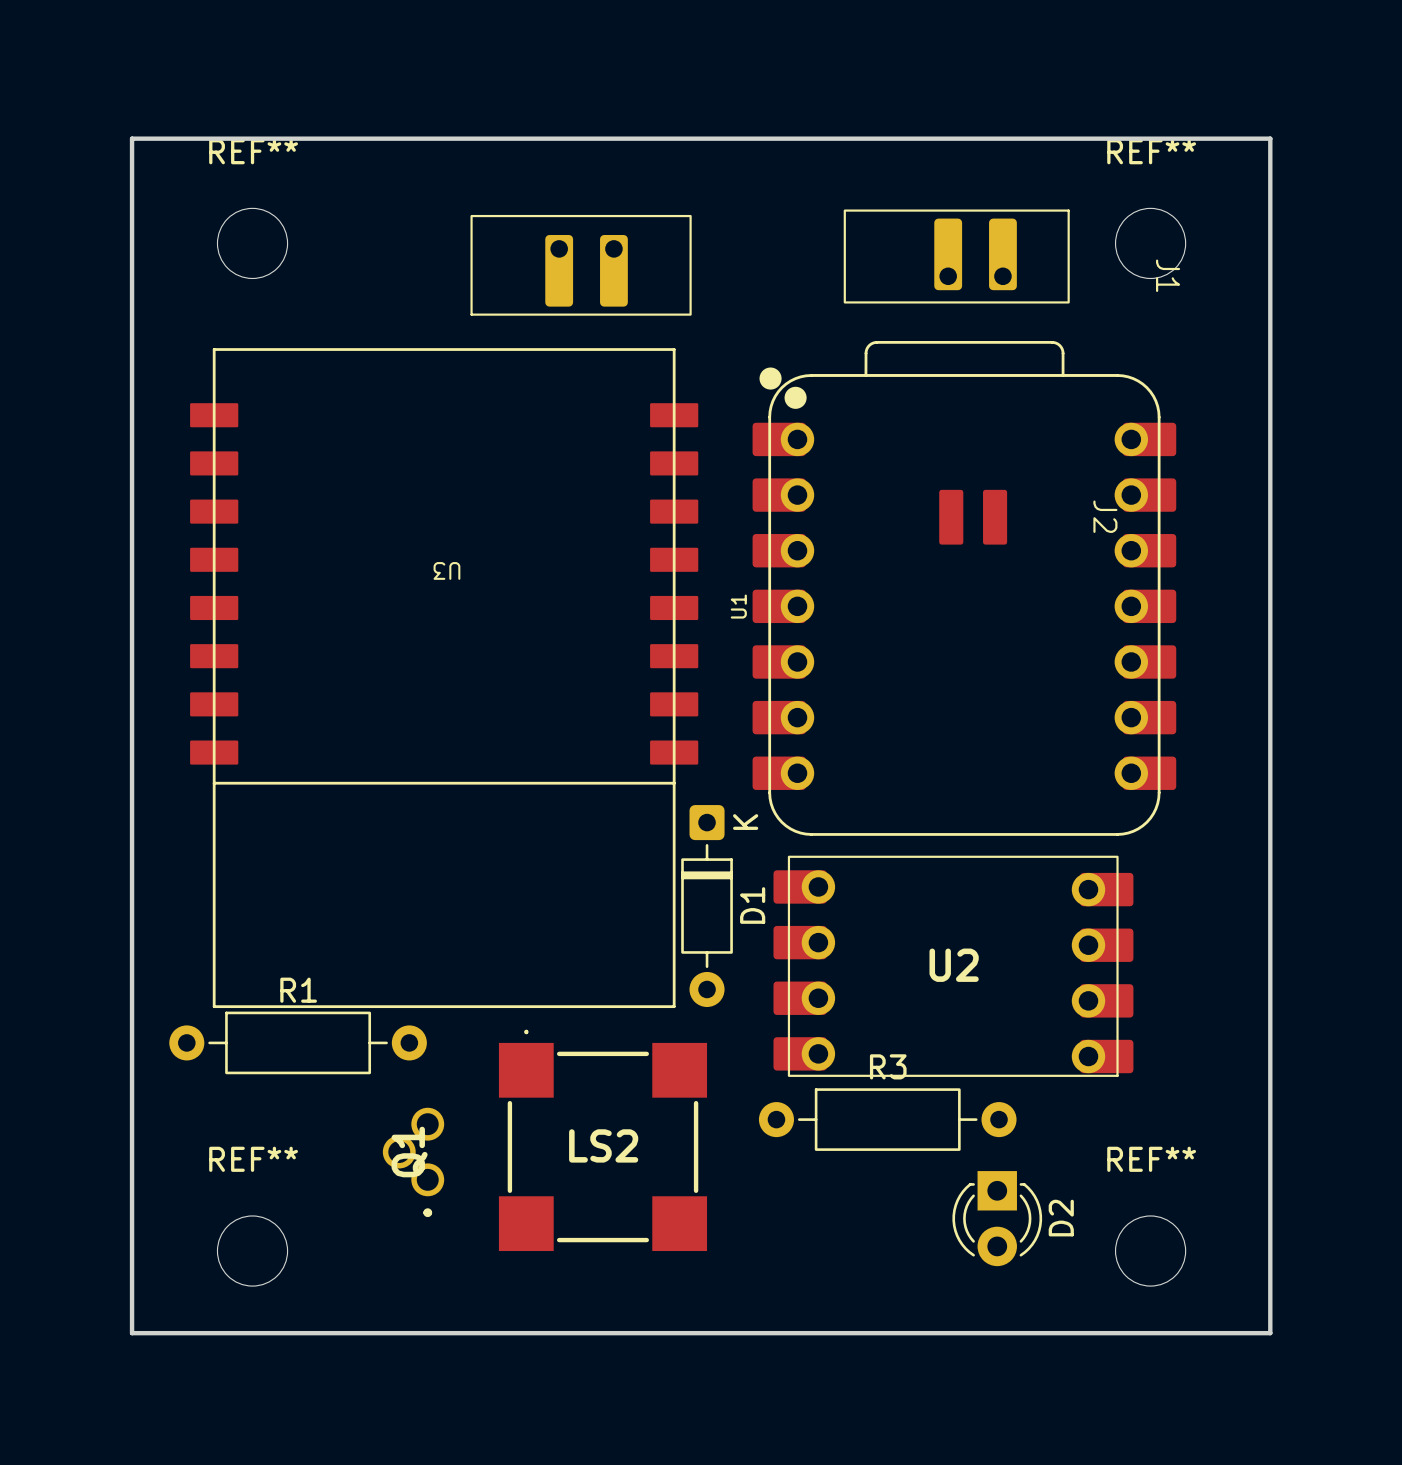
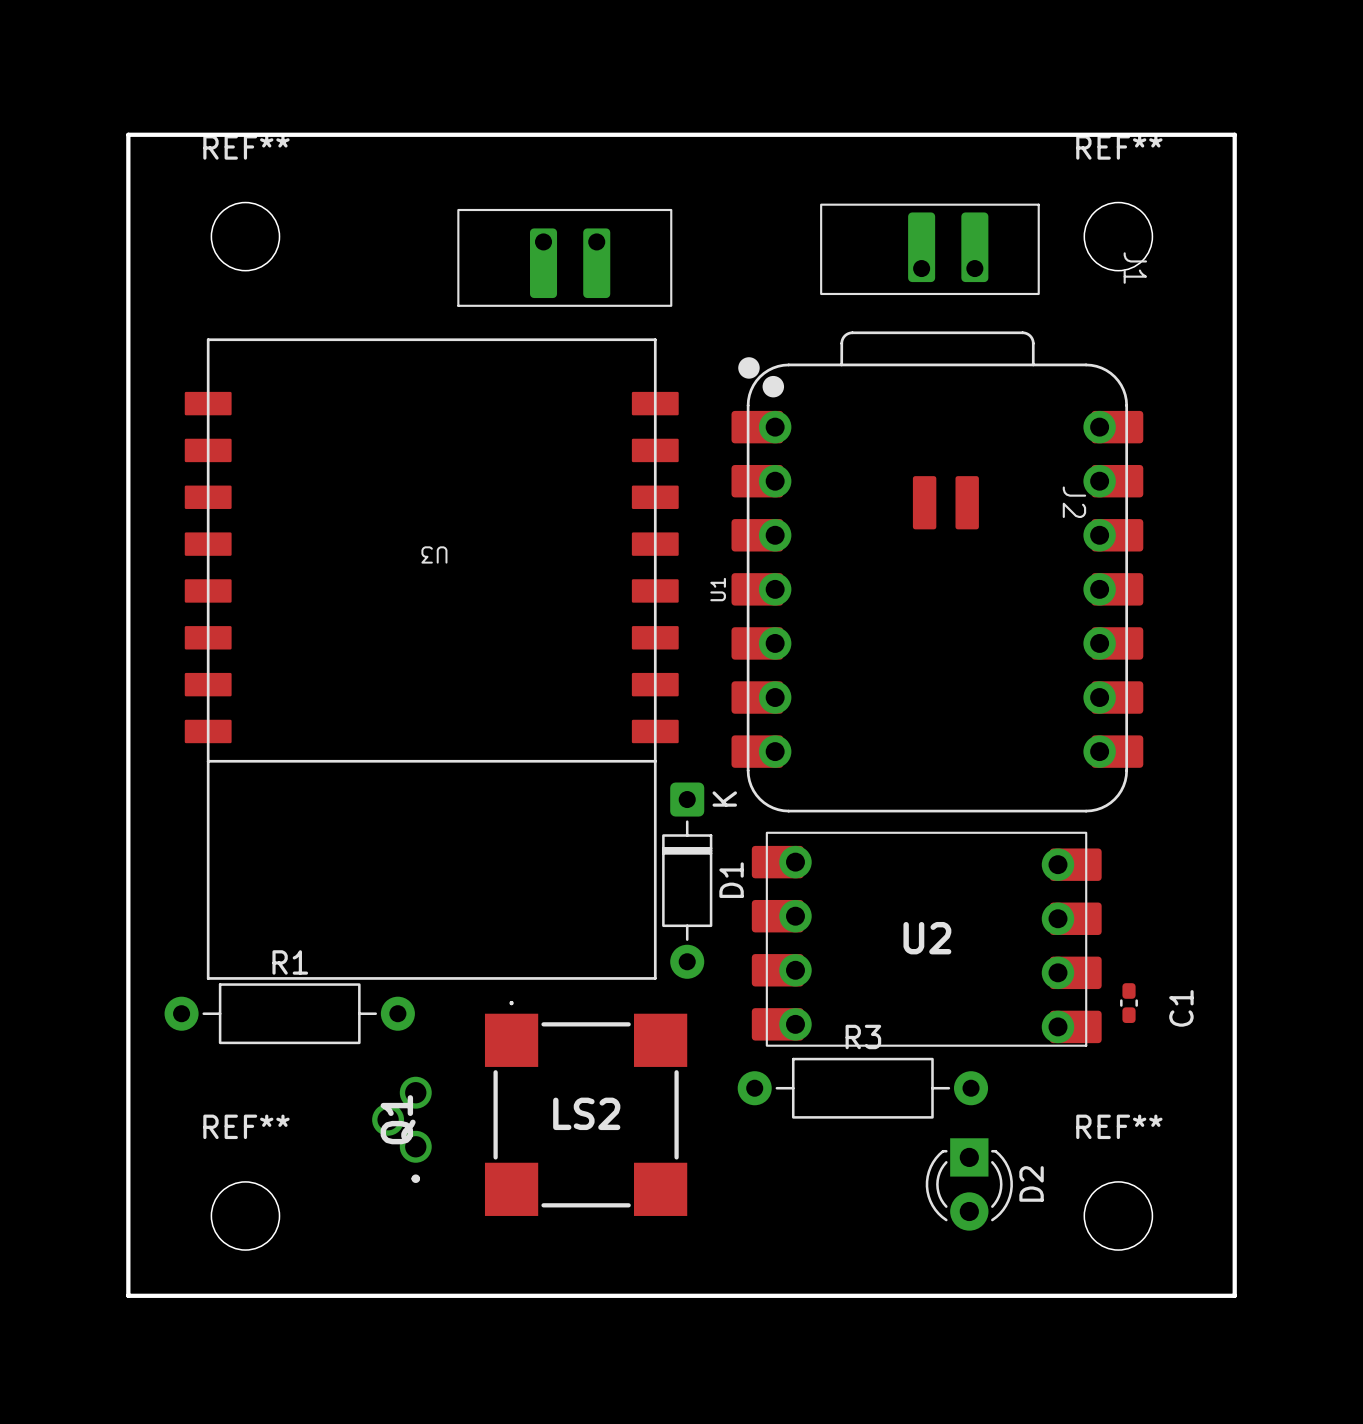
C1: none -> (1129, 1003)

